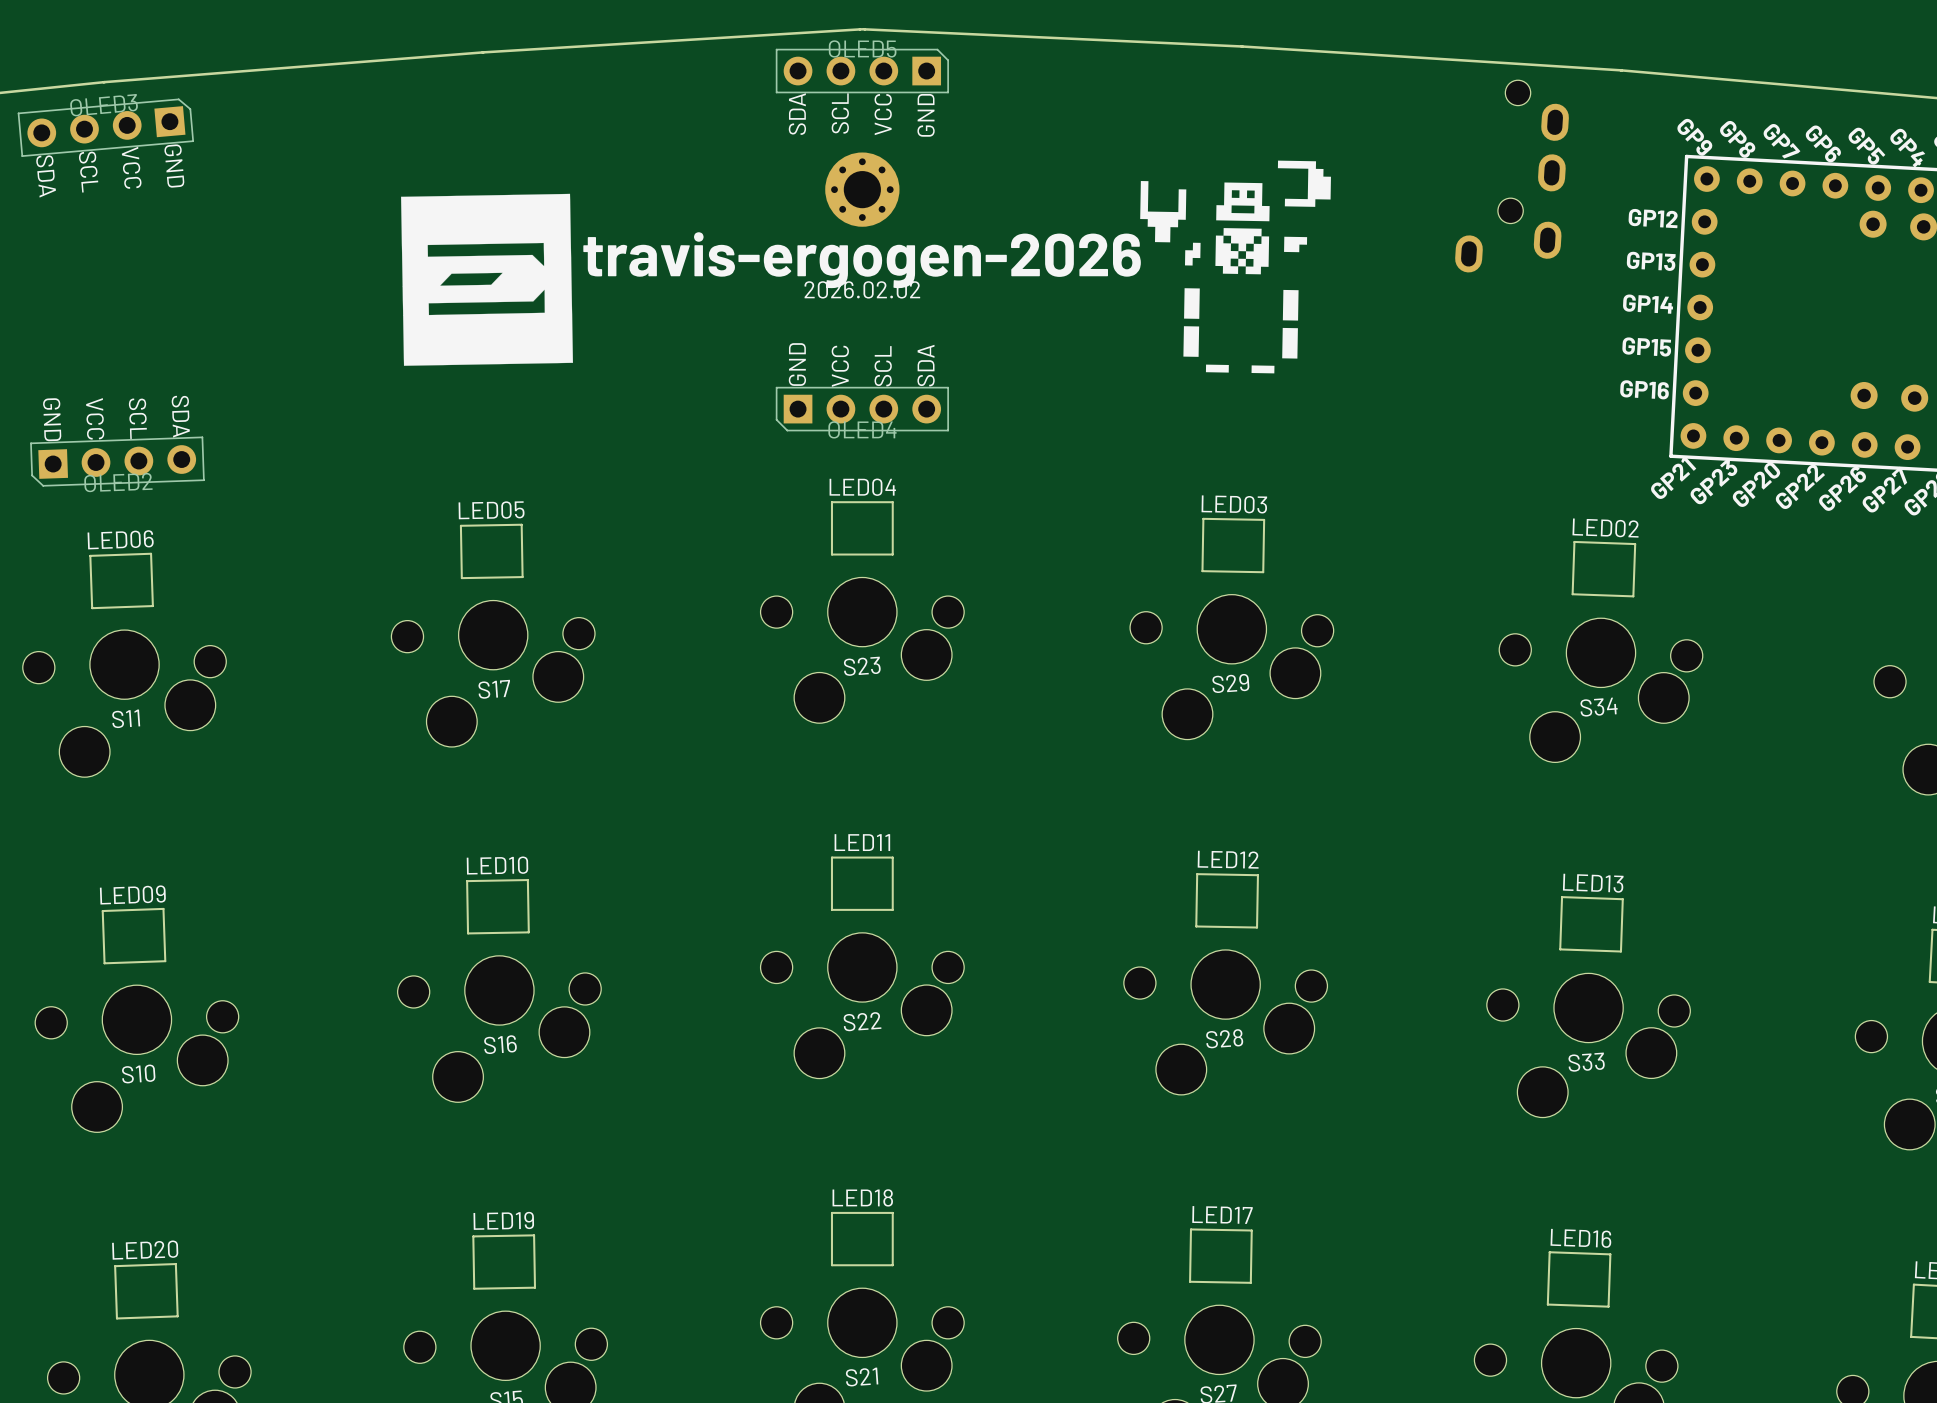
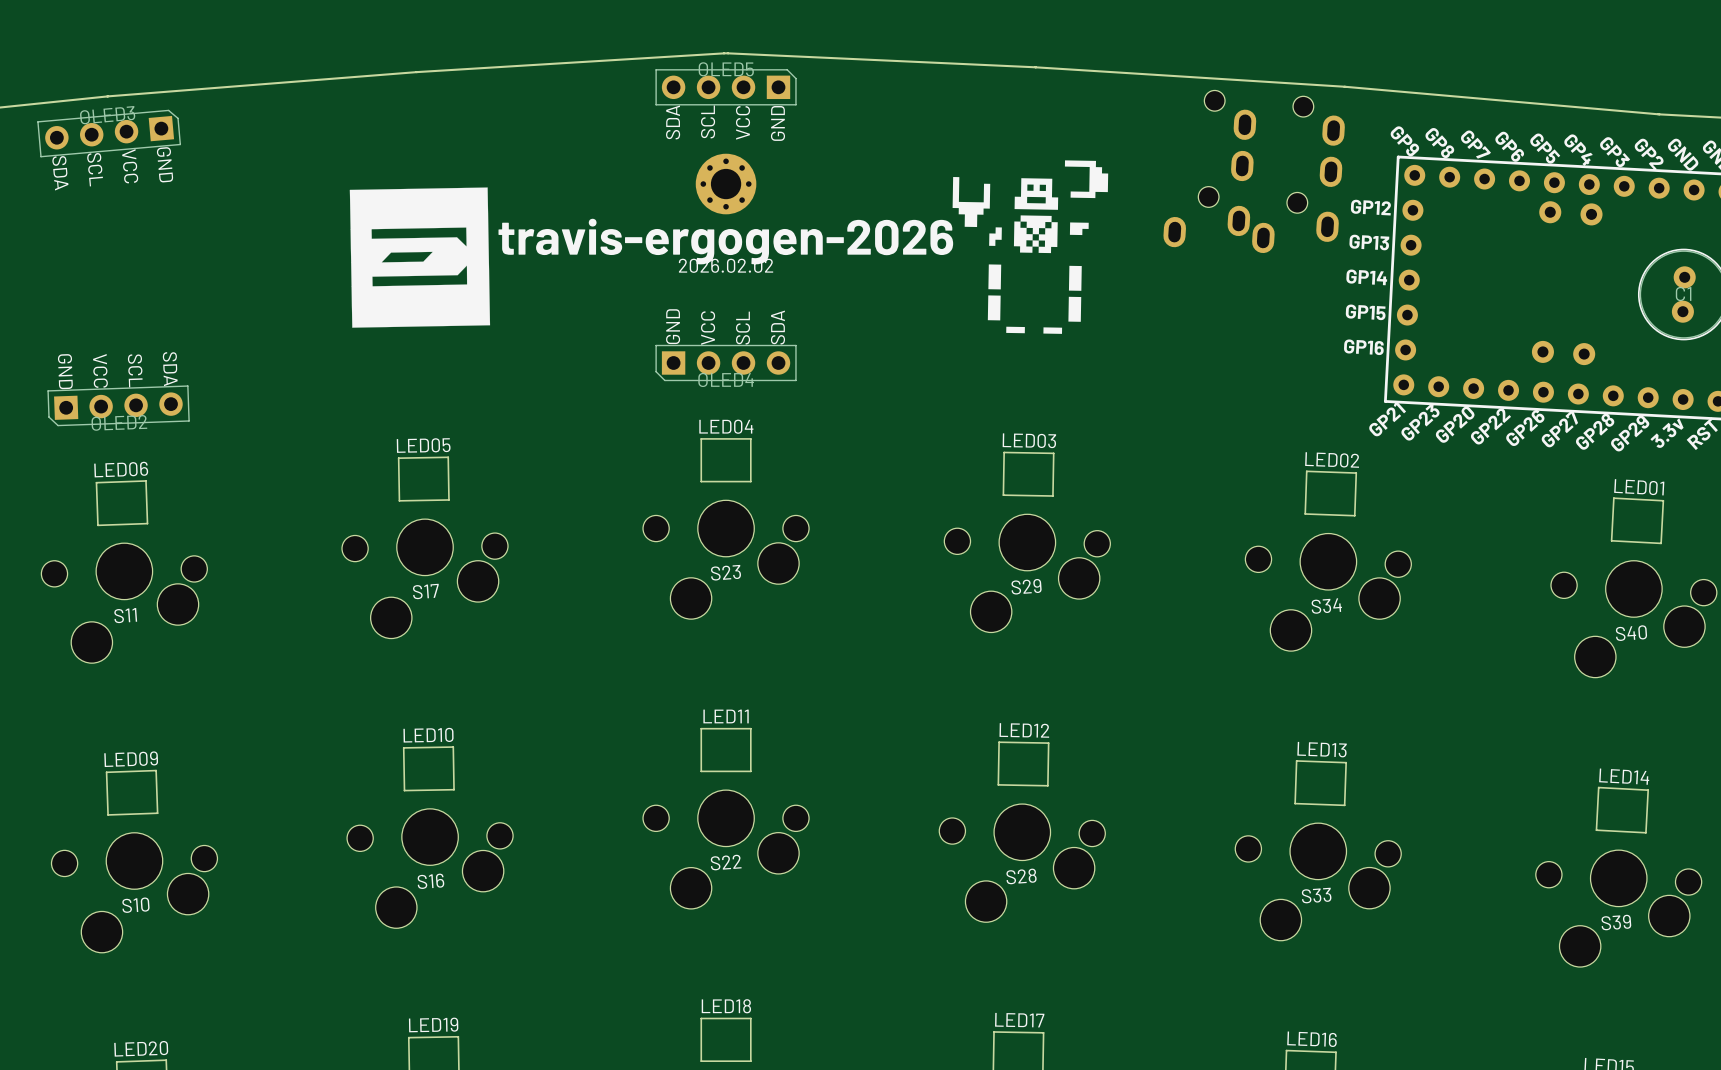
part: none -> (1209, 168)
part: (1512, 176) -> none
part: none -> (1298, 174)

